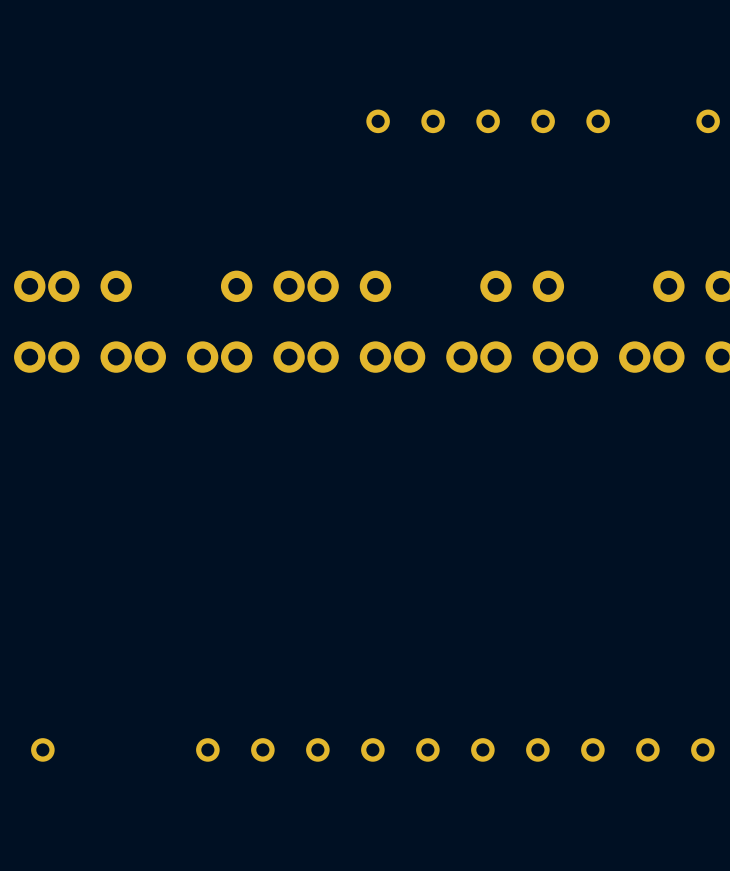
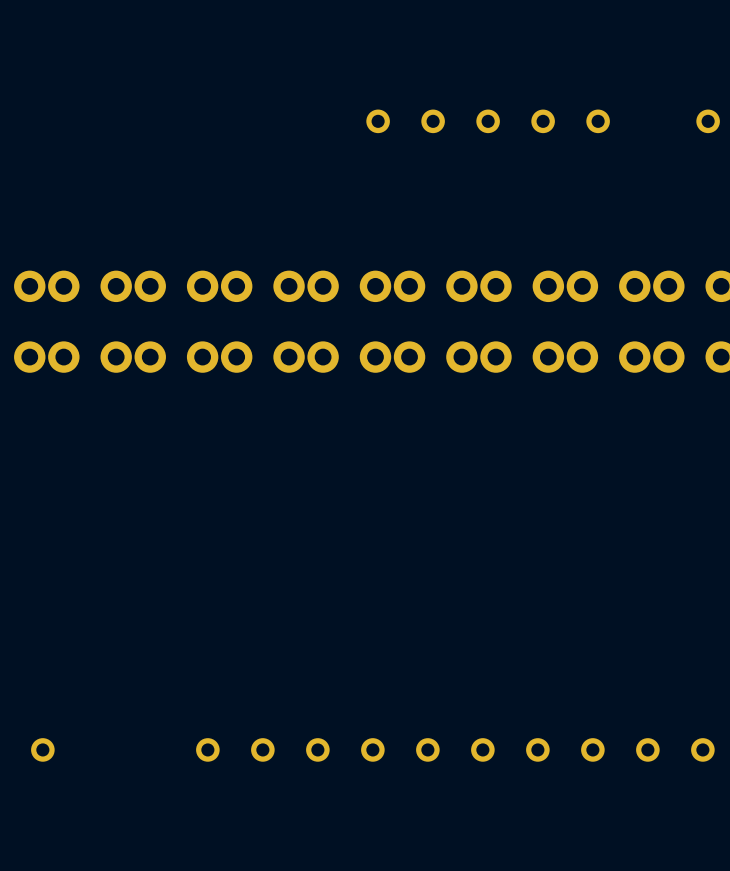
part: none -> (176, 286)
part: none -> (435, 286)
part: none -> (608, 286)

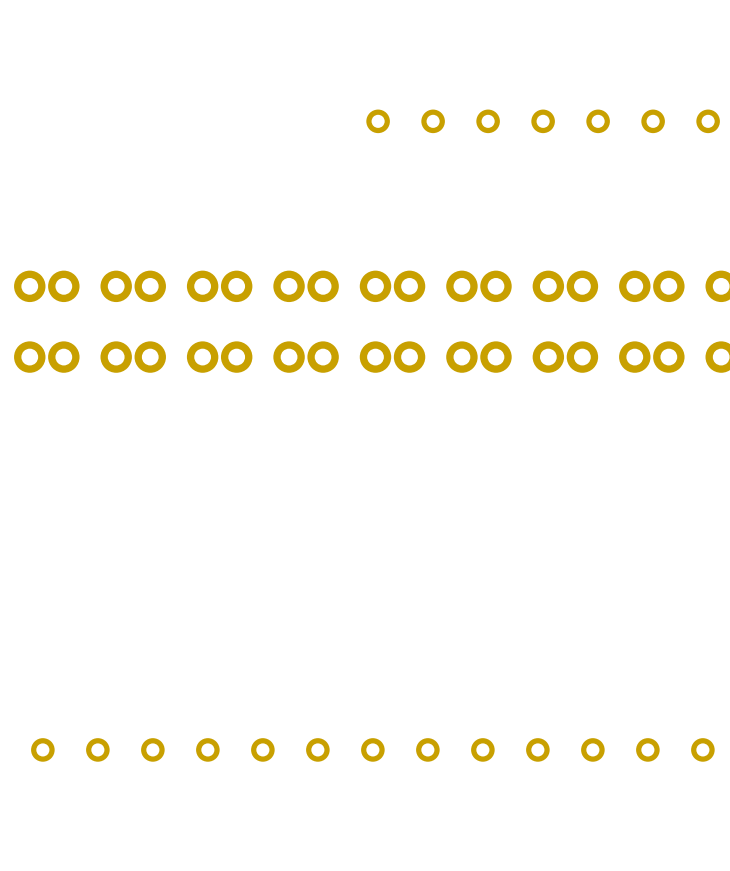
part: none -> (653, 121)
part: none -> (97, 749)
part: none -> (152, 749)

